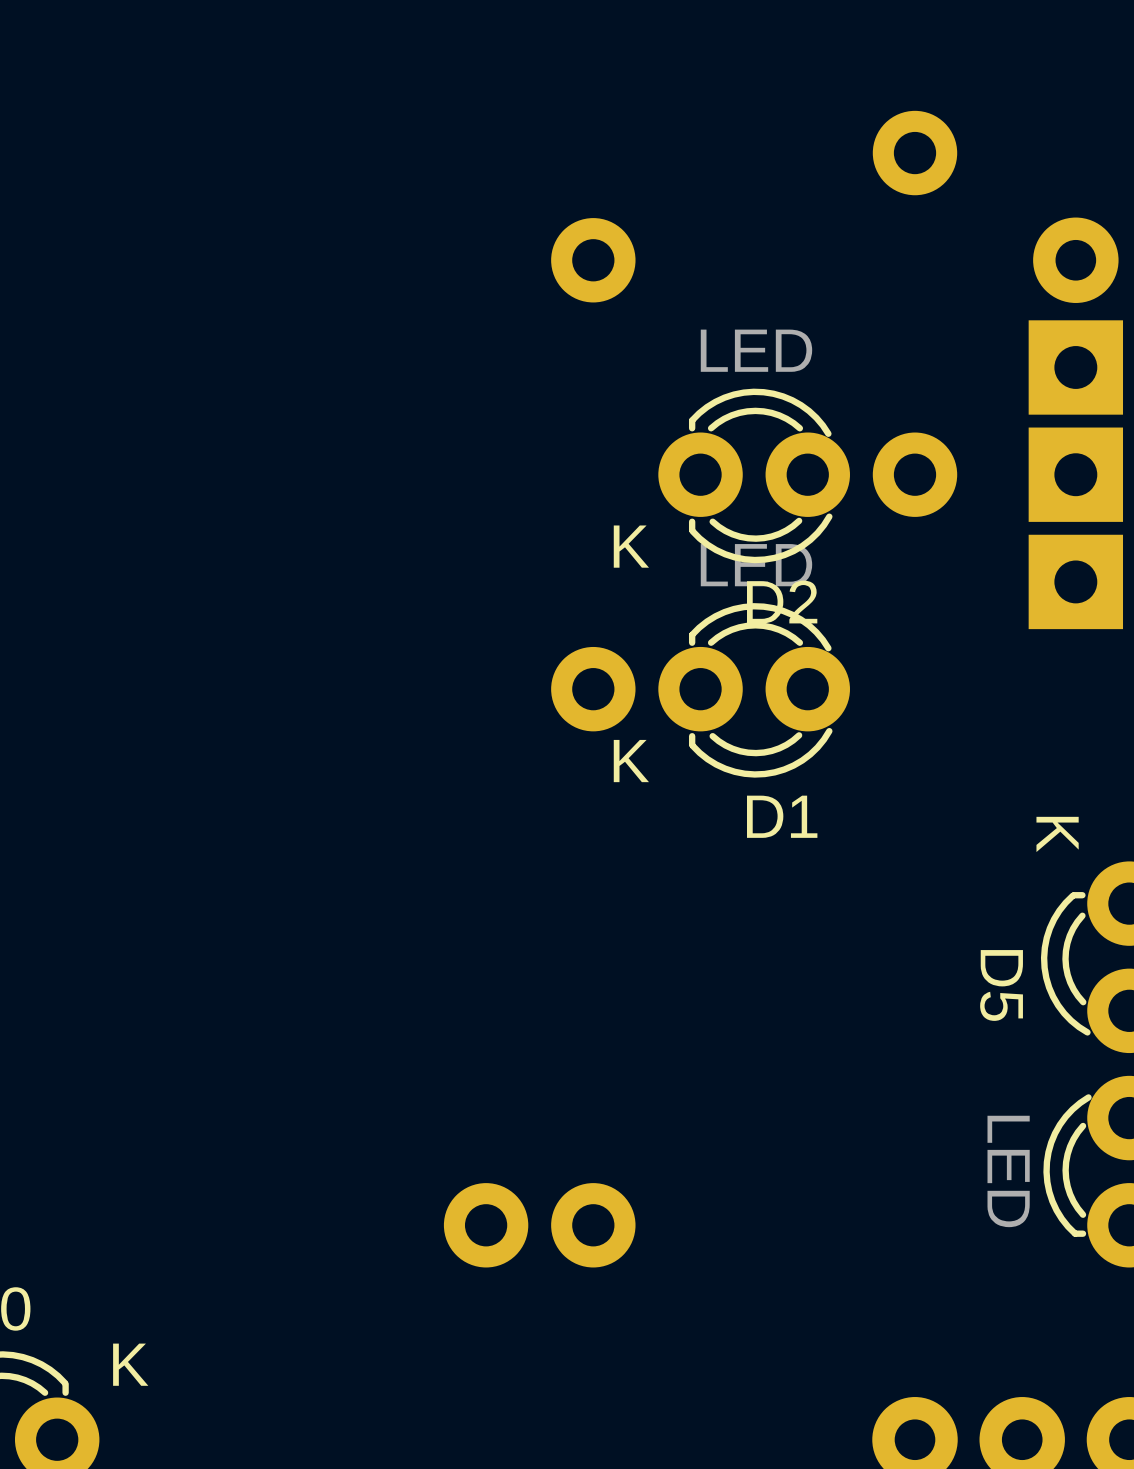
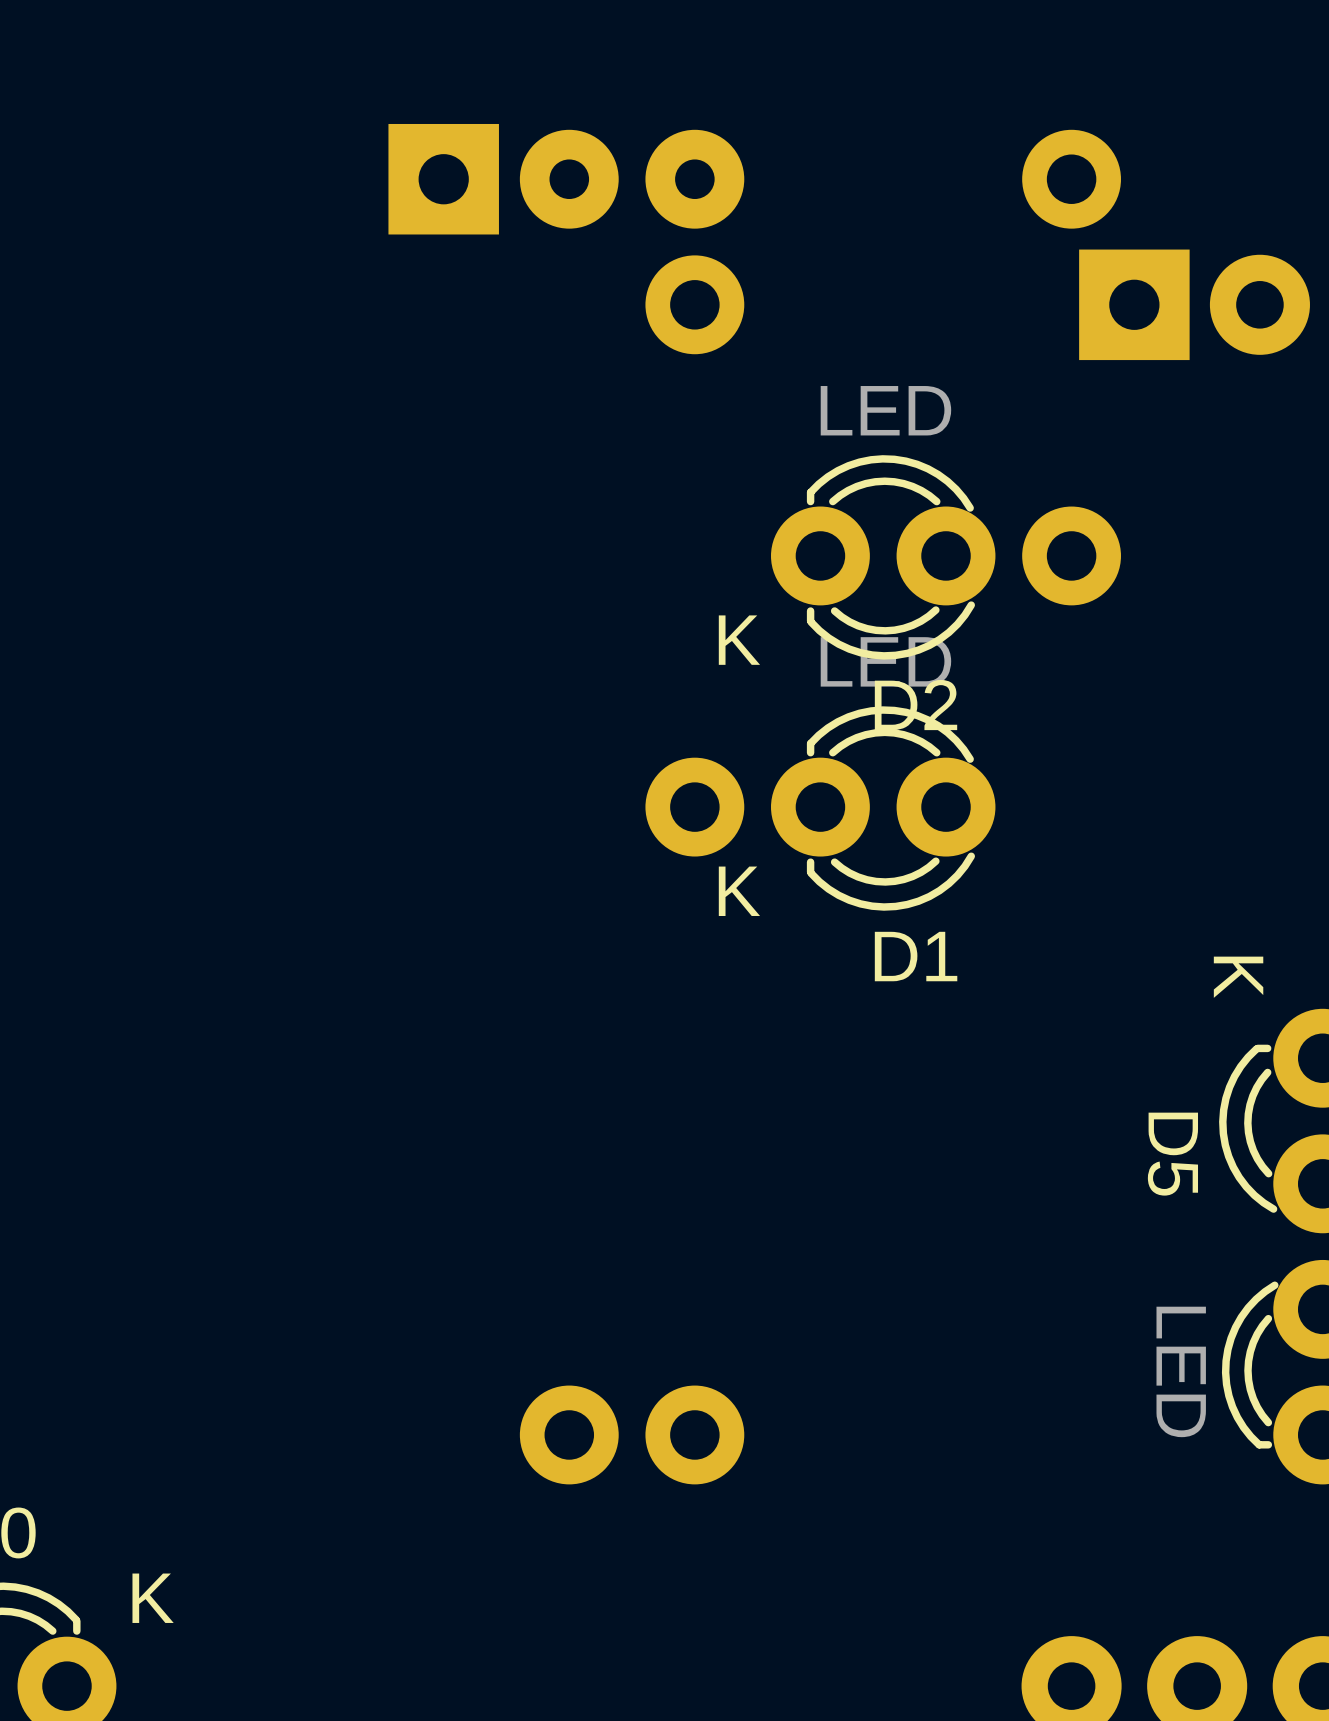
part: none -> (443, 179)
part: none -> (632, 179)
part: none -> (1134, 304)
part: (1075, 367) -> none
part: (1075, 474) -> none
part: (1075, 581) -> none

